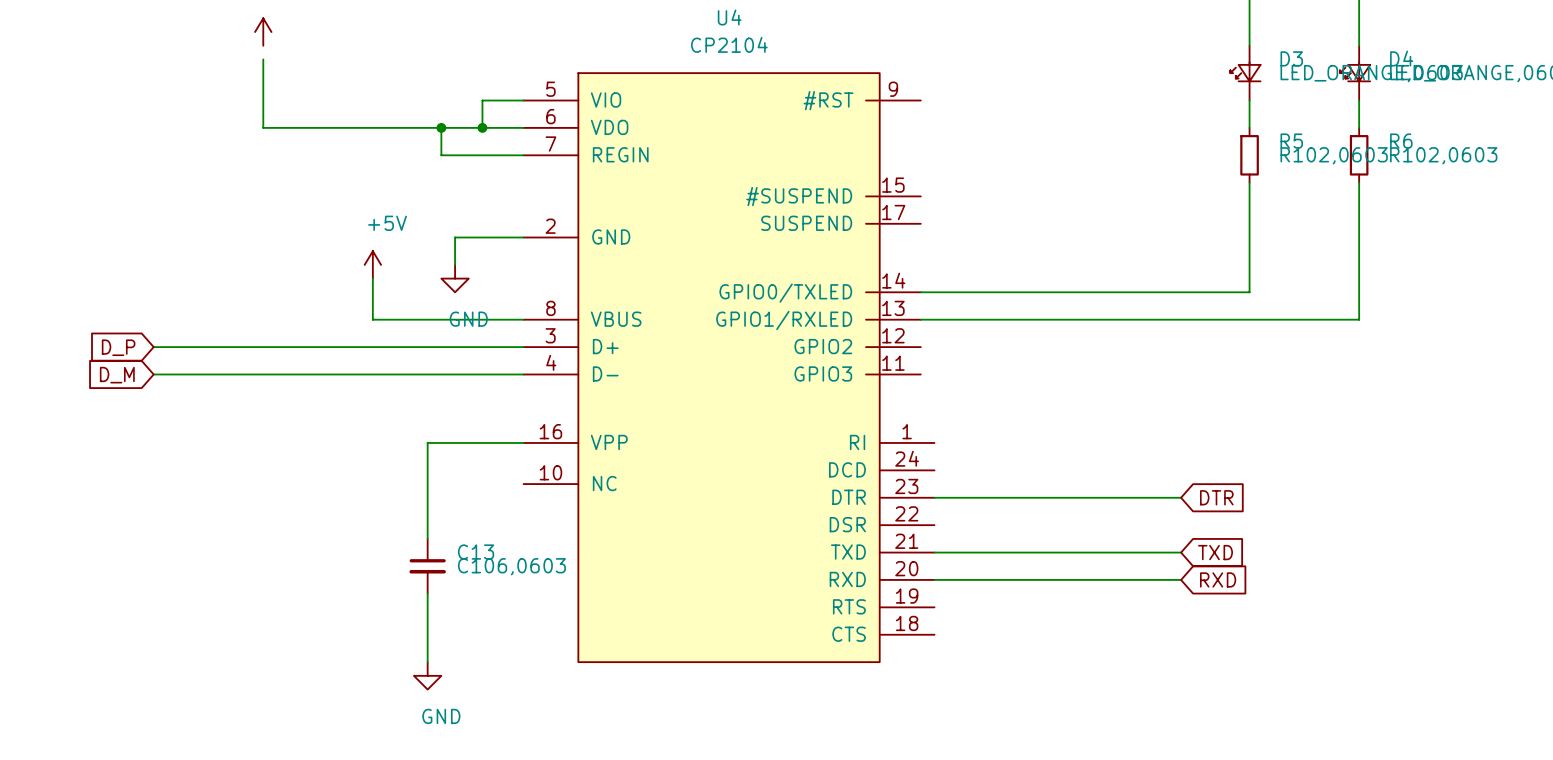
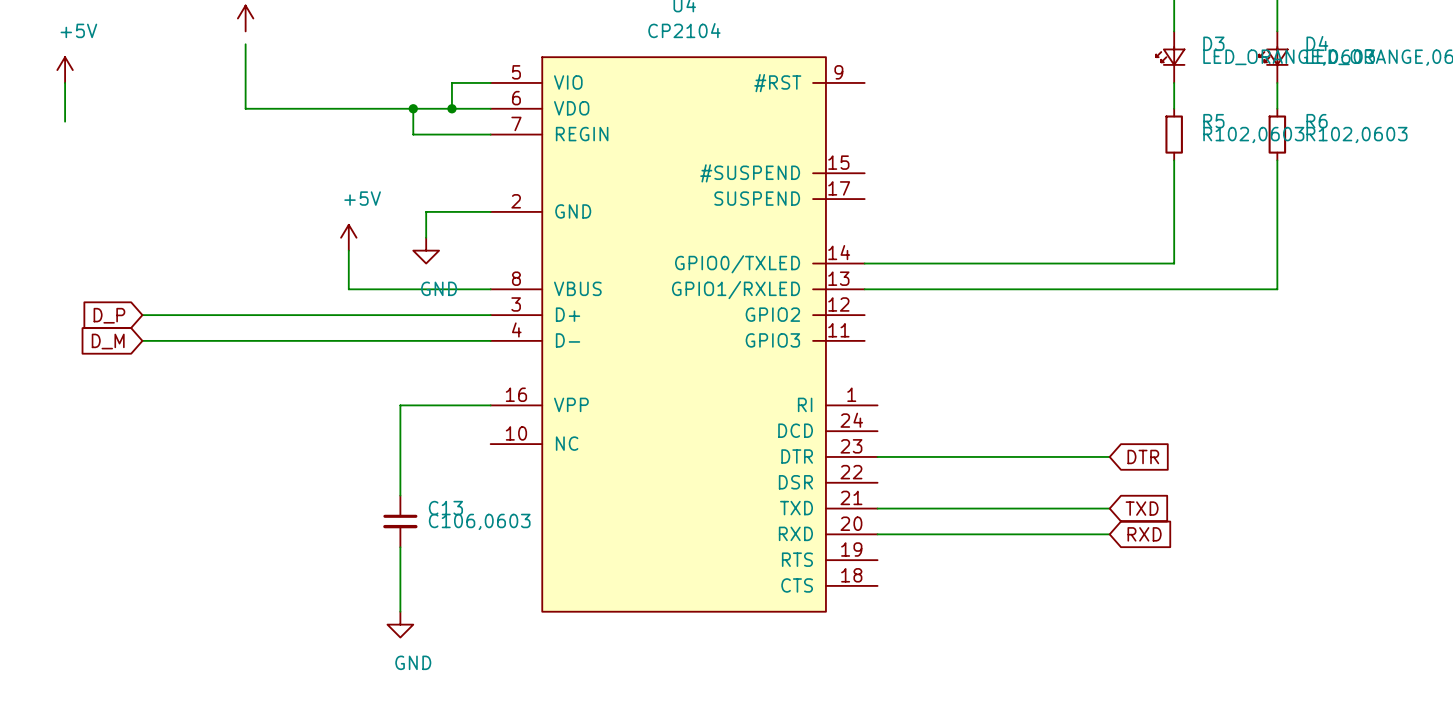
power symbol: none -> +5V (65, 70)
wire: none -> (65, 82) (65, 121)

